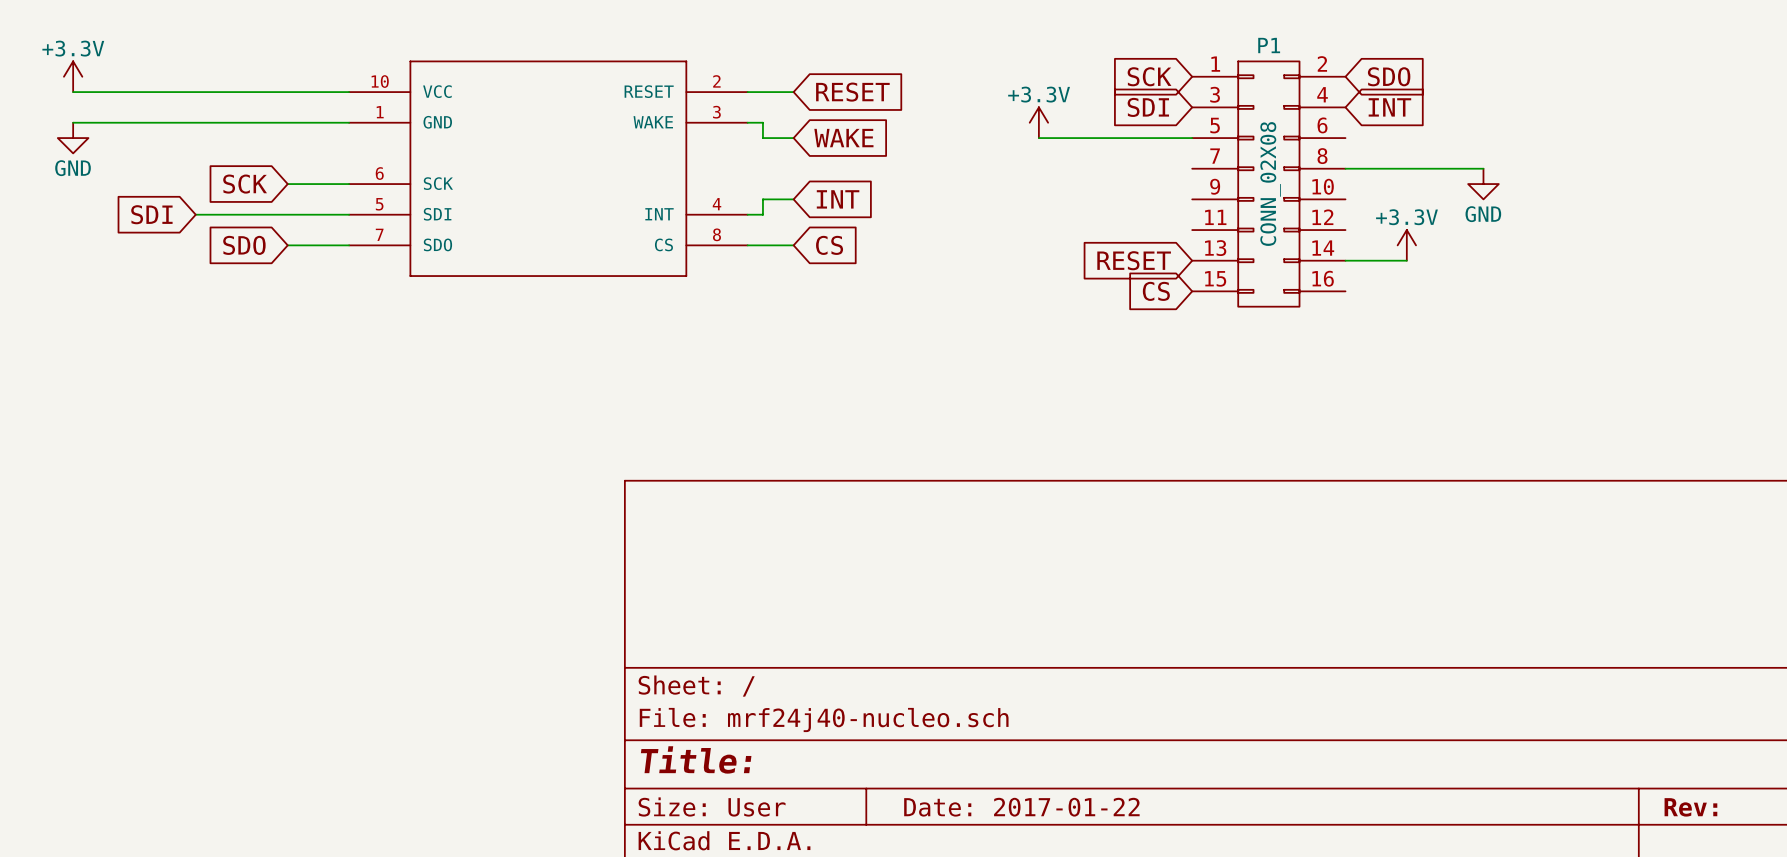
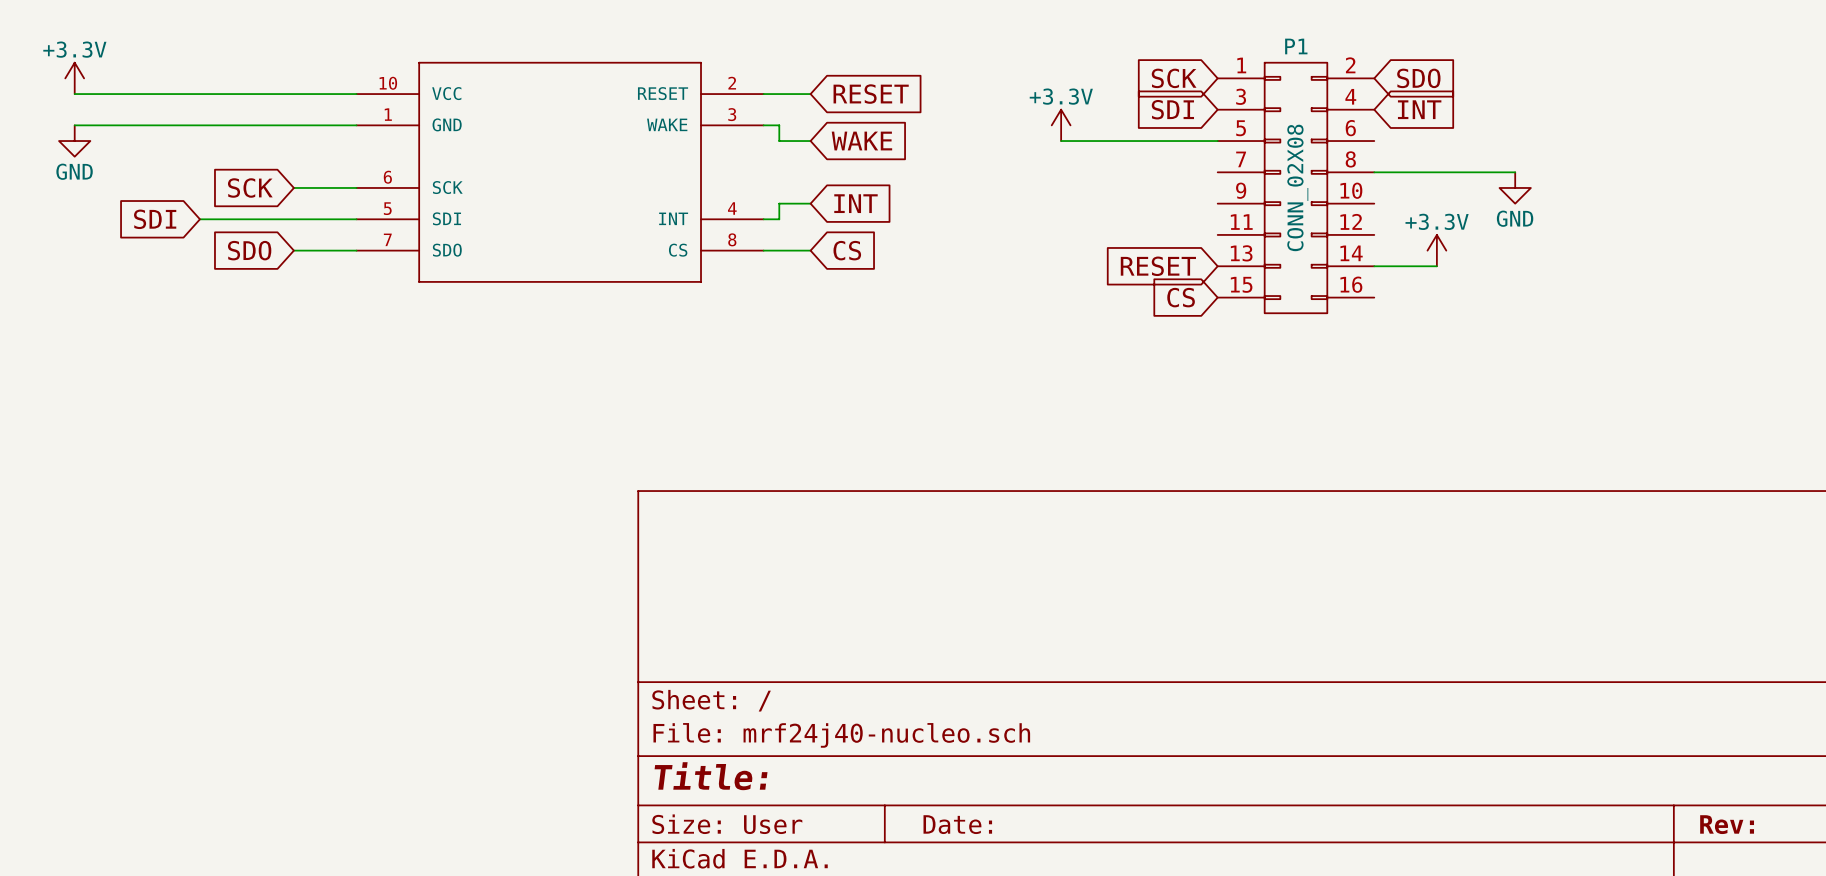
title block: Date: 2017-01-22 (1021, 807) -> Date: (957, 824)

